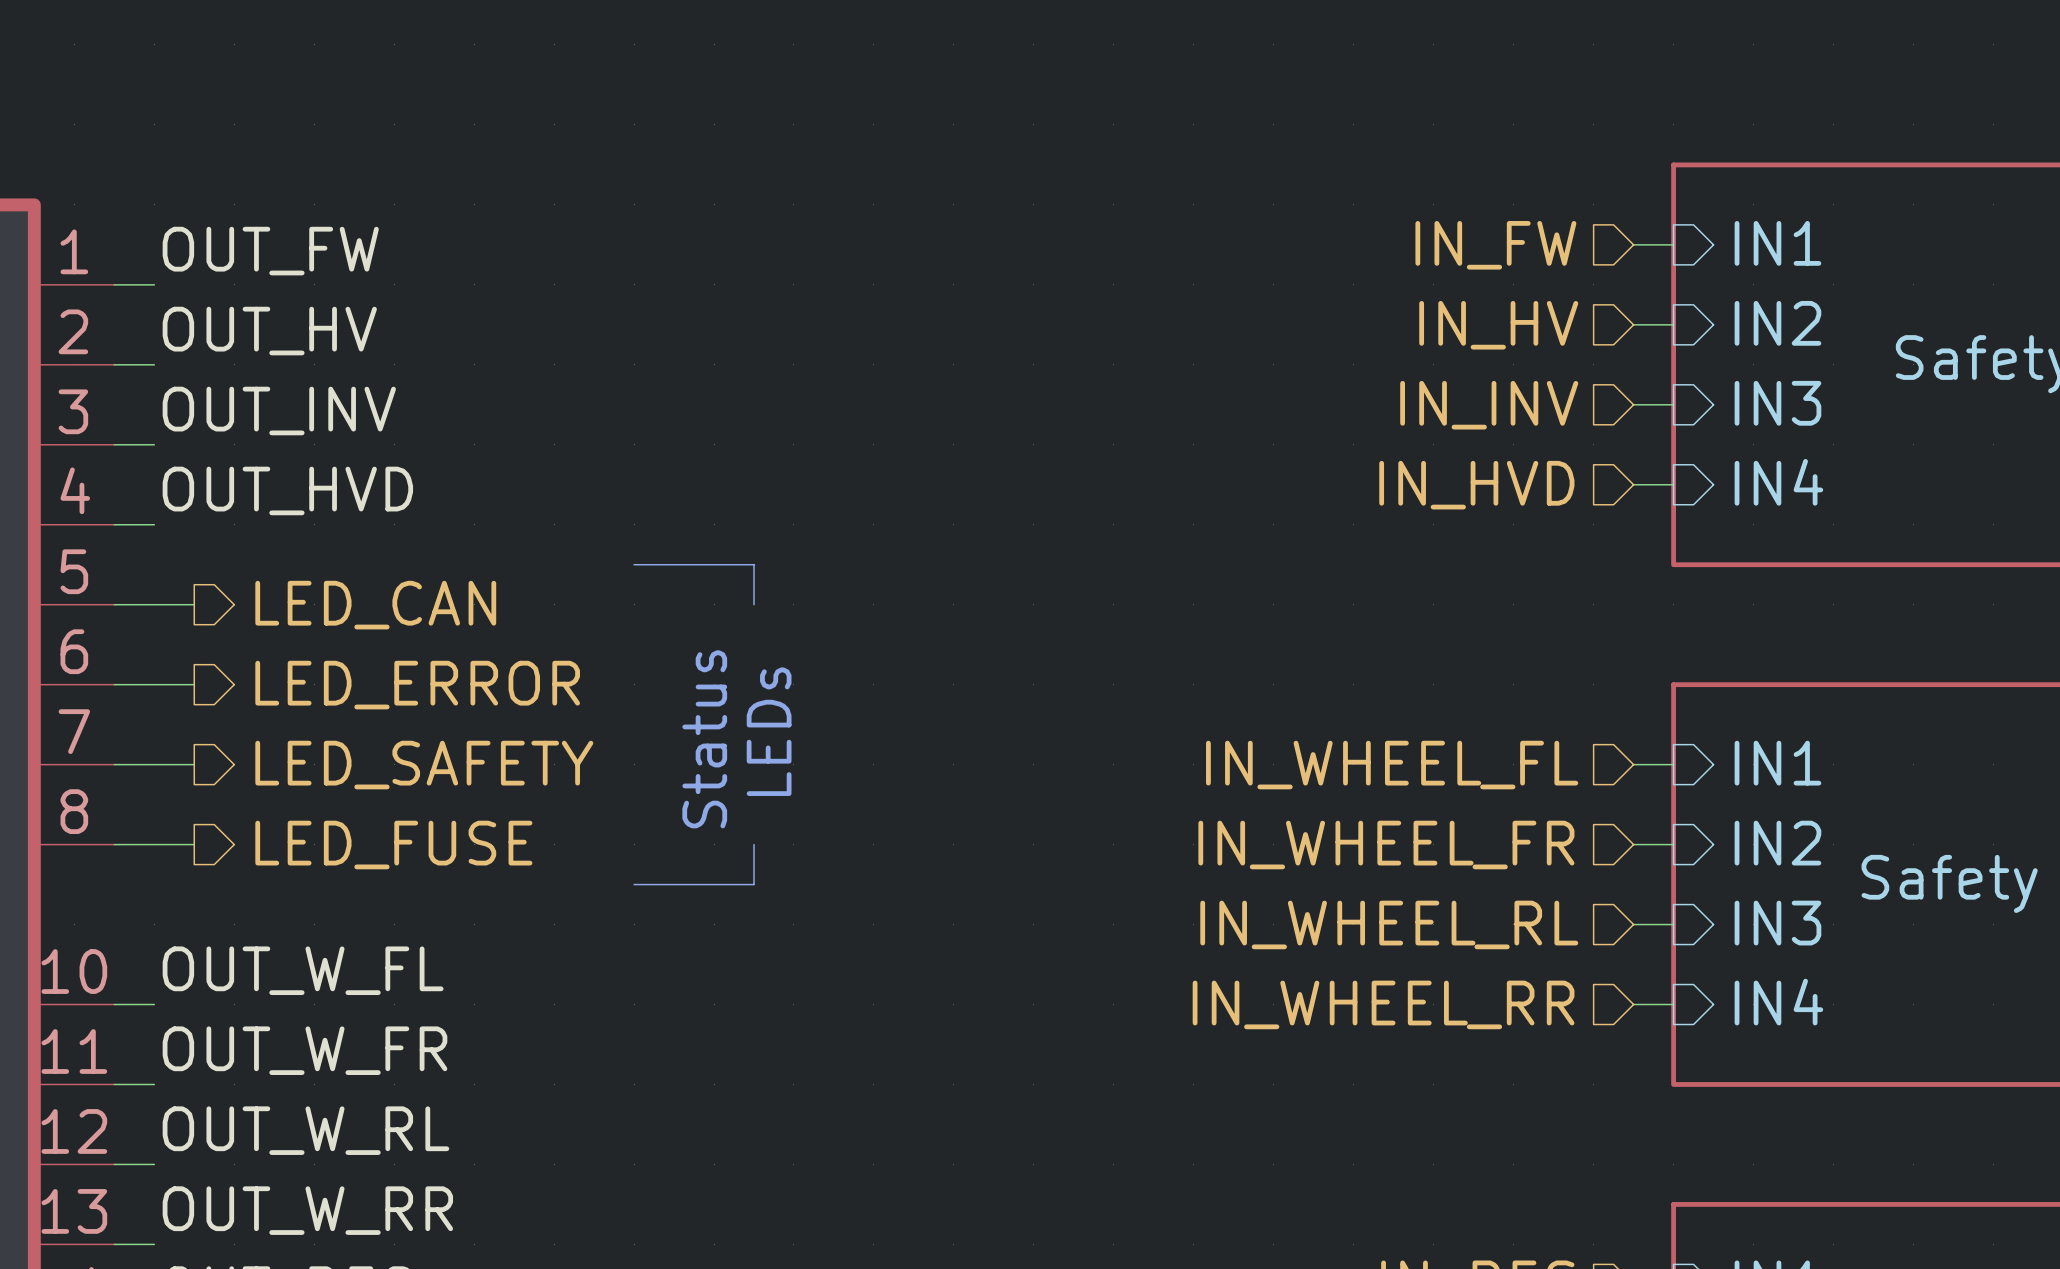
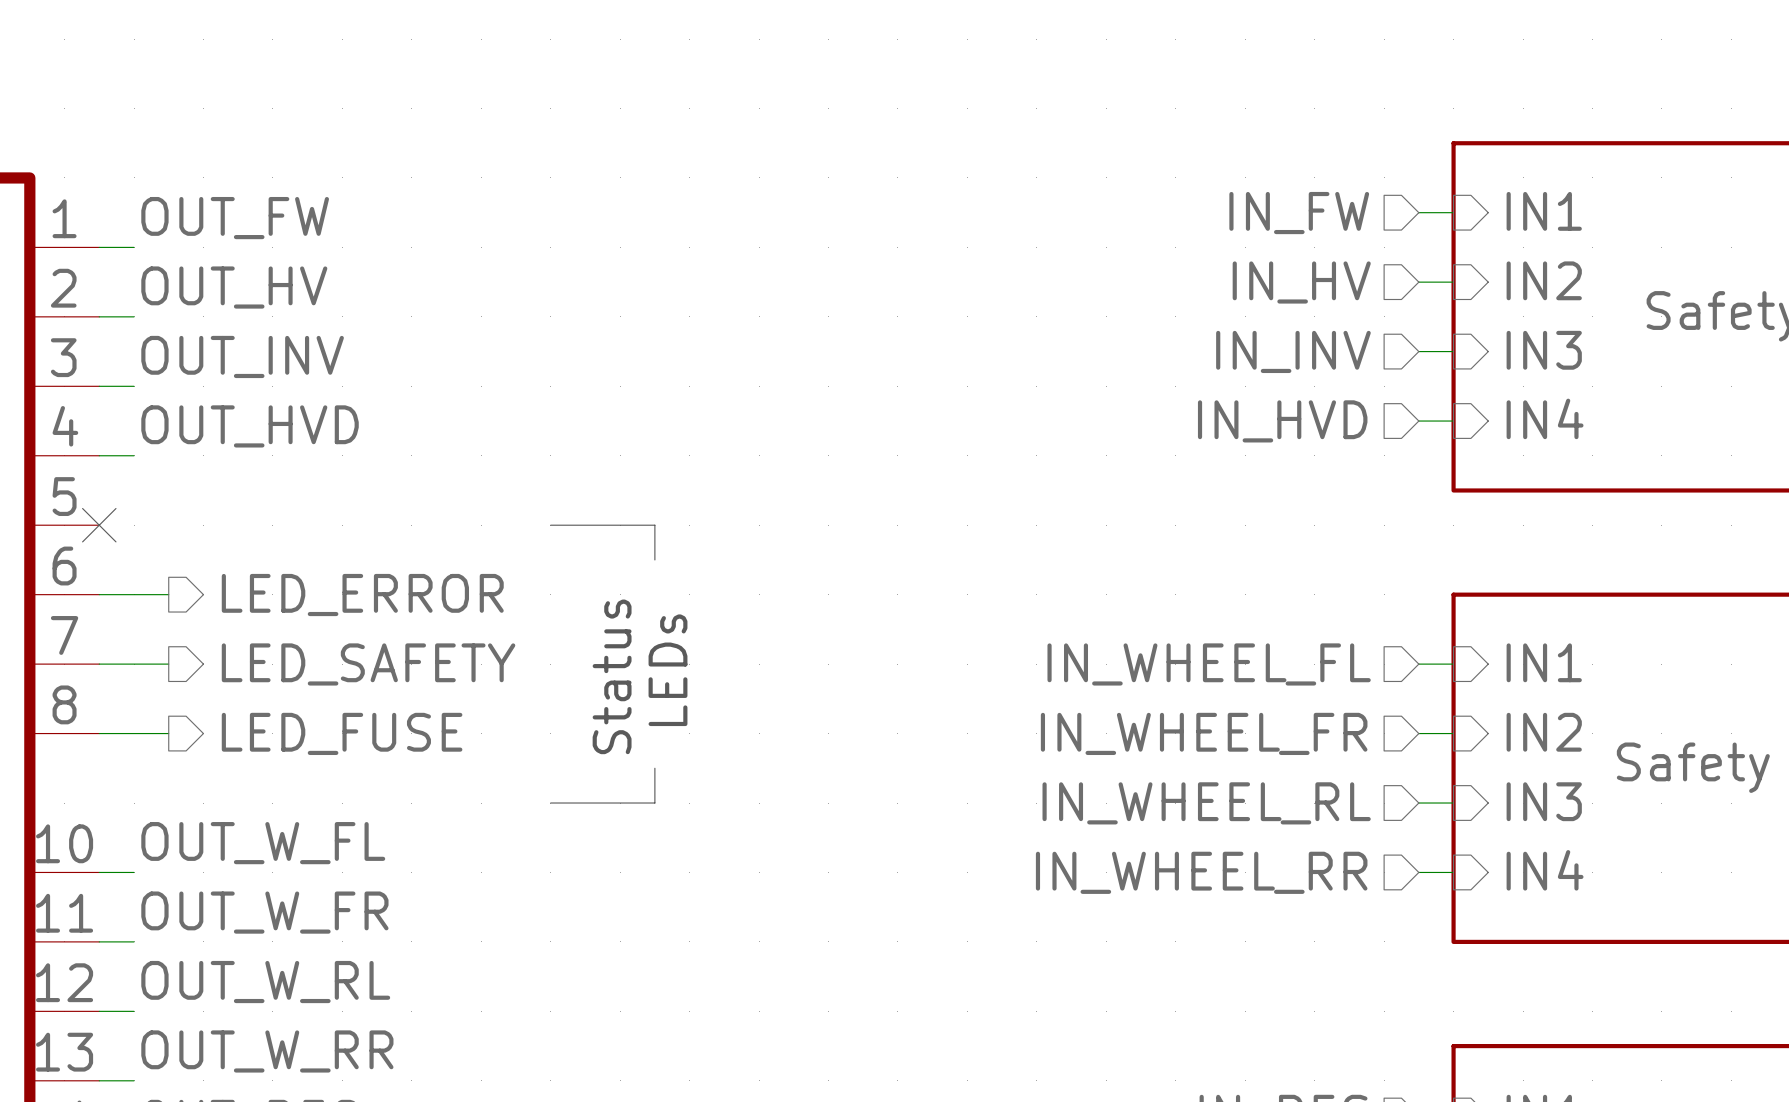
line: (634, 564) (754, 564) (754, 604) -> (550, 525) (654, 525) (654, 559)
wire: (114, 604) (194, 604) -> none
no-connect mark: none -> (99, 525)
hierarchical label: LED_CAN (375, 605) -> none
text position: LEDs (769, 731) -> LEDs (668, 670)
text position: Status (704, 739) -> Status (612, 676)
line: (754, 844) (754, 884) (634, 884) -> (654, 768) (654, 803) (550, 803)

